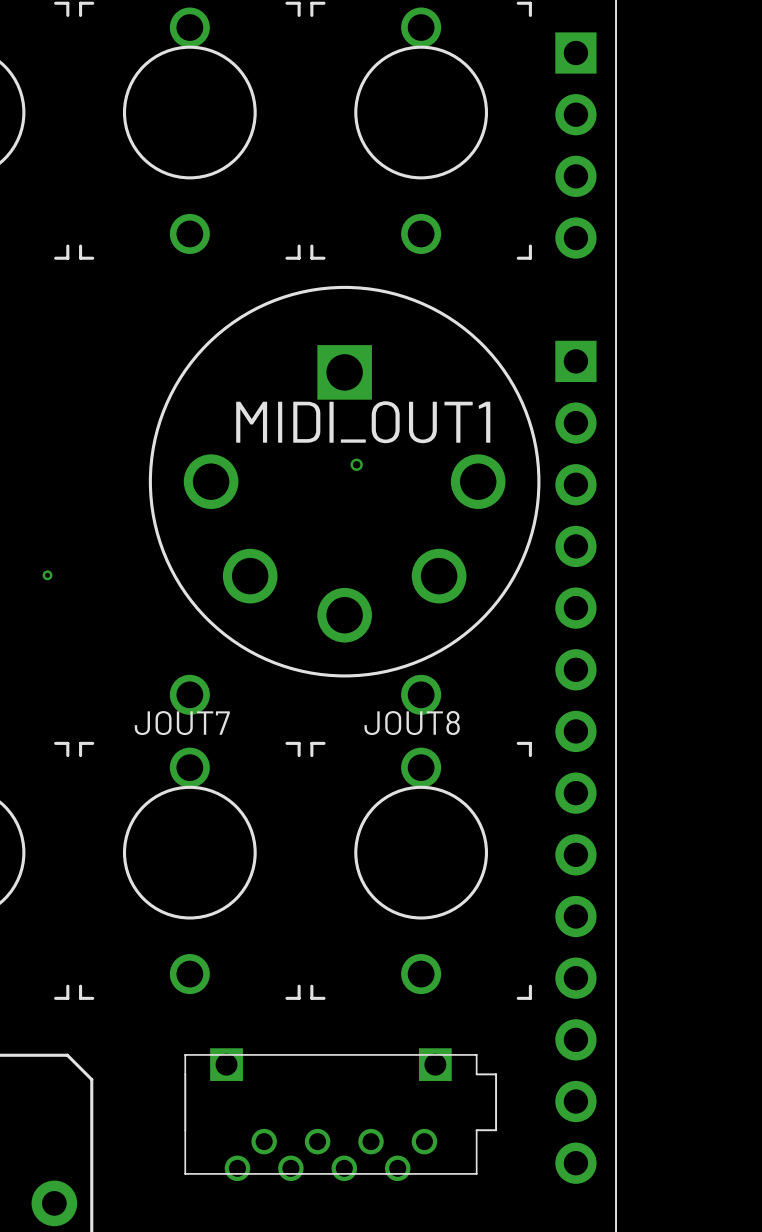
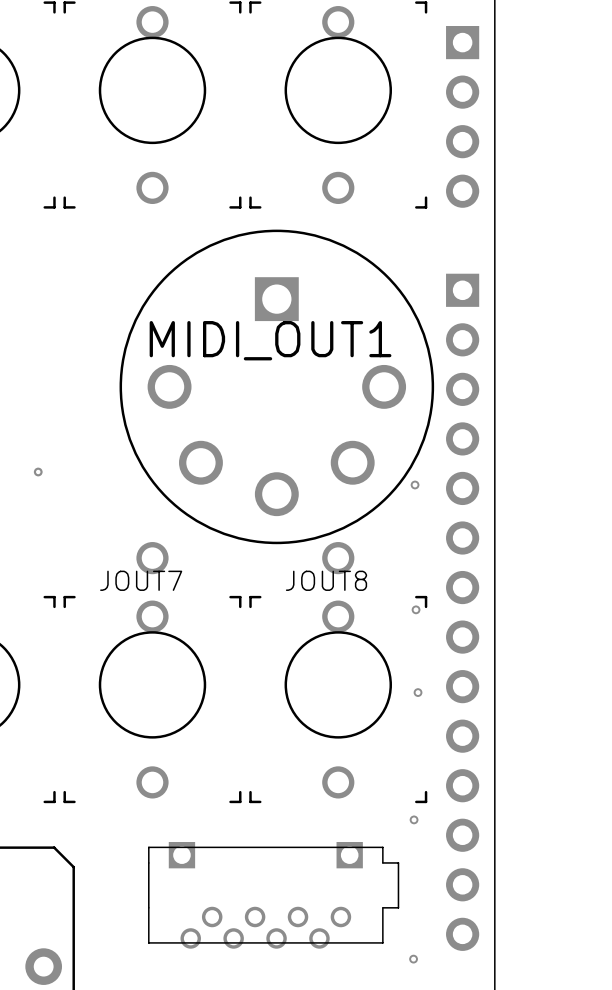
via: (356, 464) -> none
via: (47, 575) -> none
via: none -> (38, 472)
via: none -> (415, 484)
via: none -> (416, 609)
via: none -> (418, 692)
via: none -> (414, 819)
via: none -> (413, 959)

